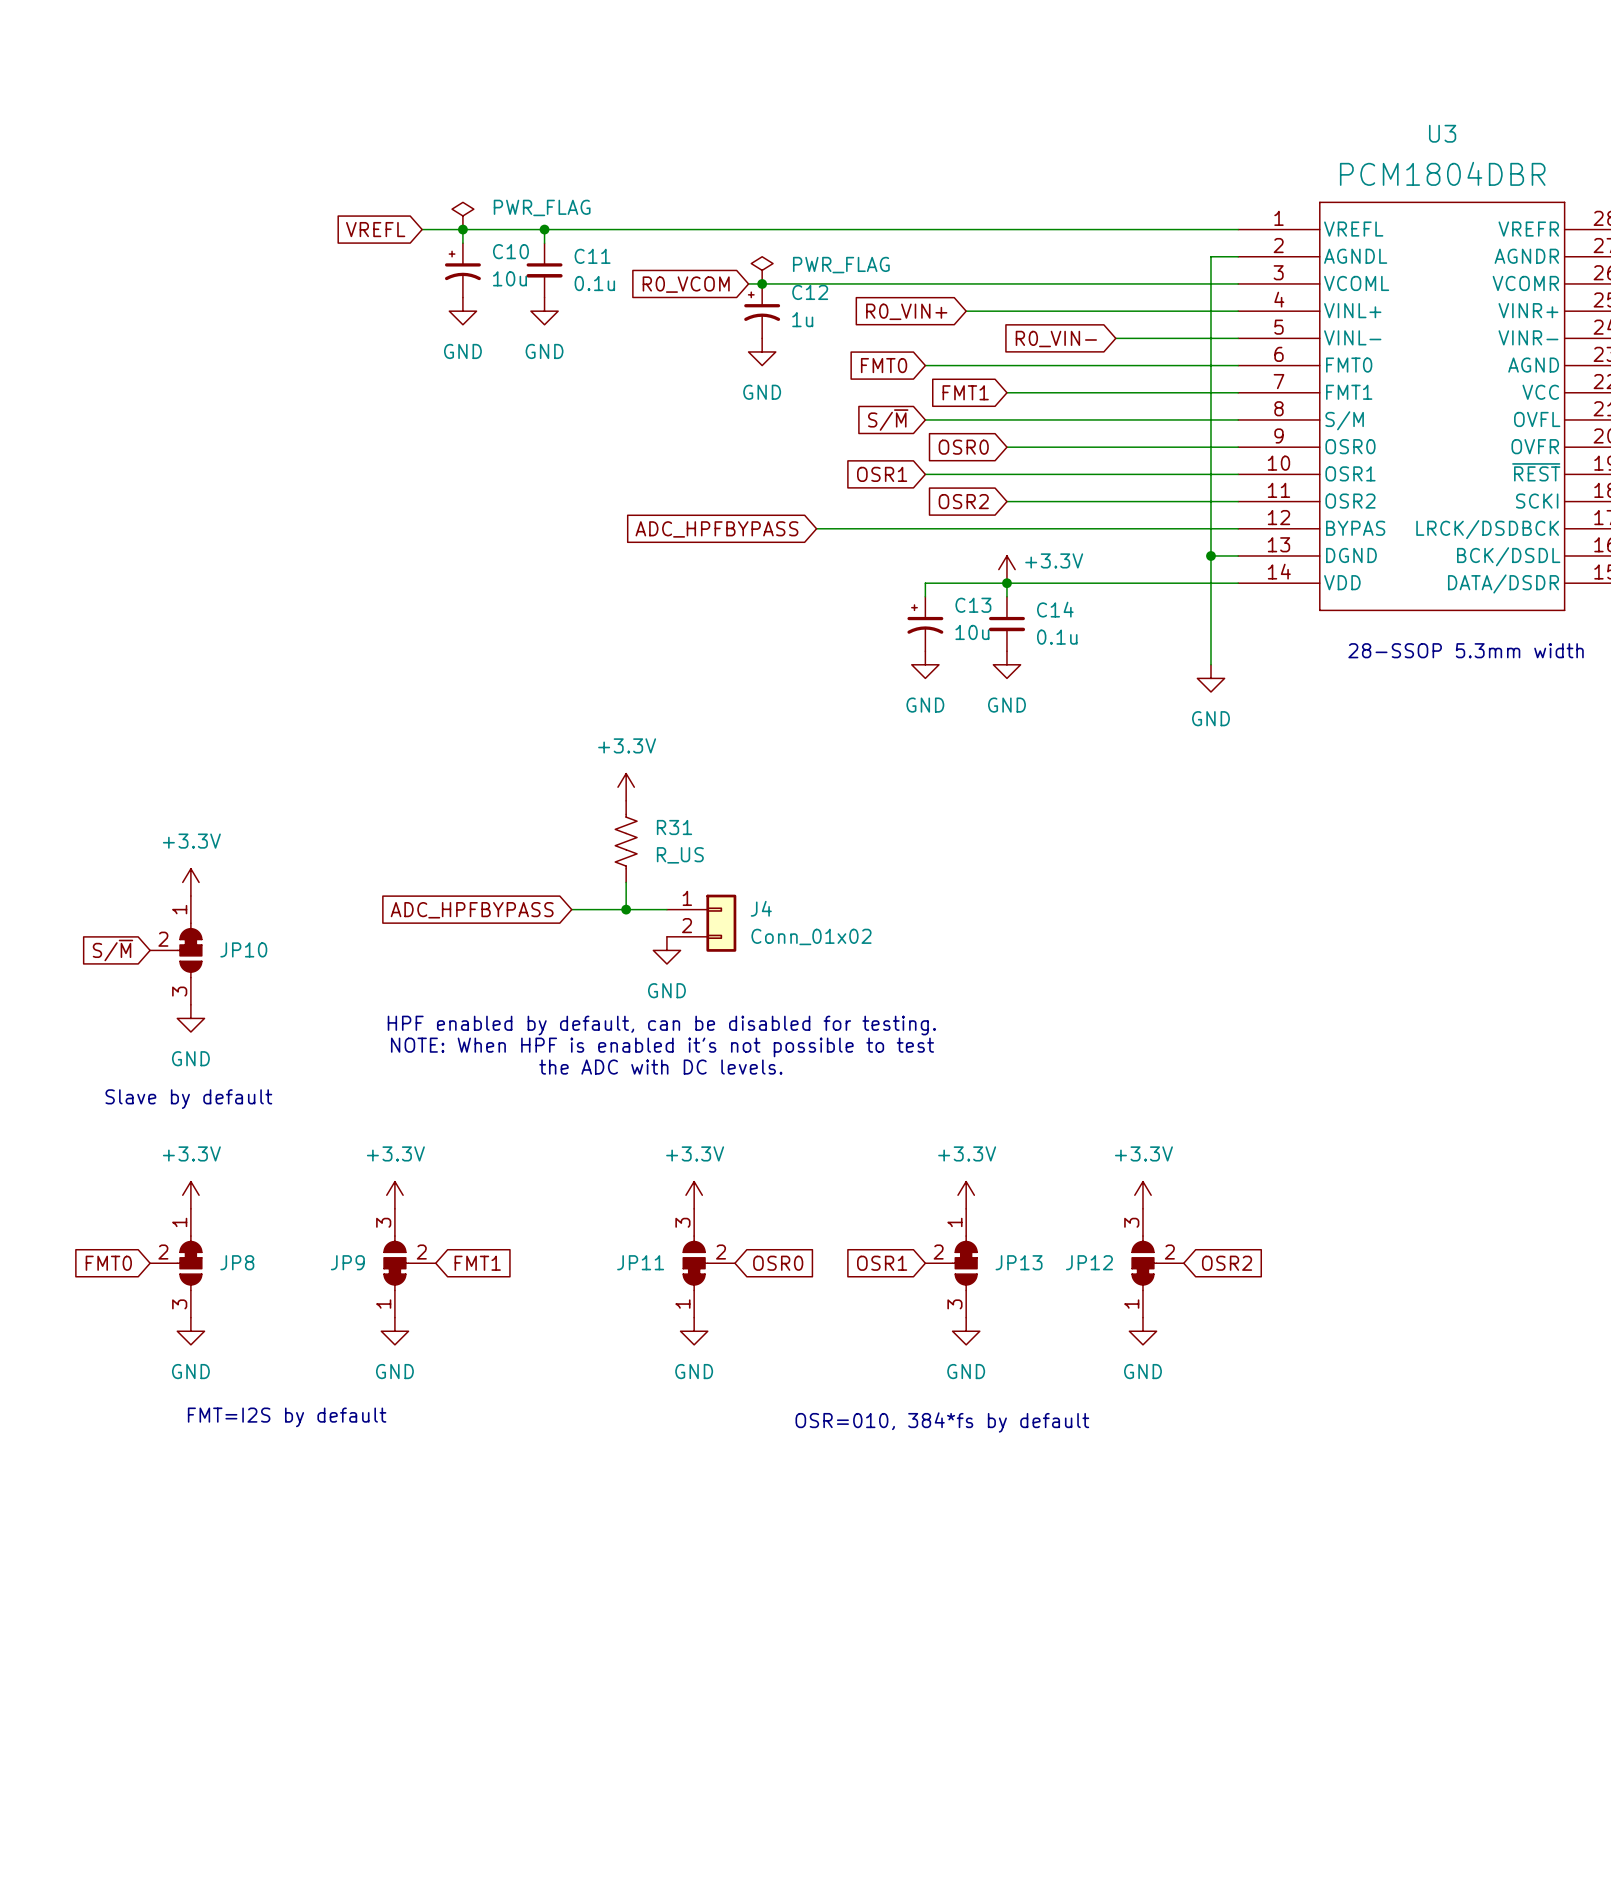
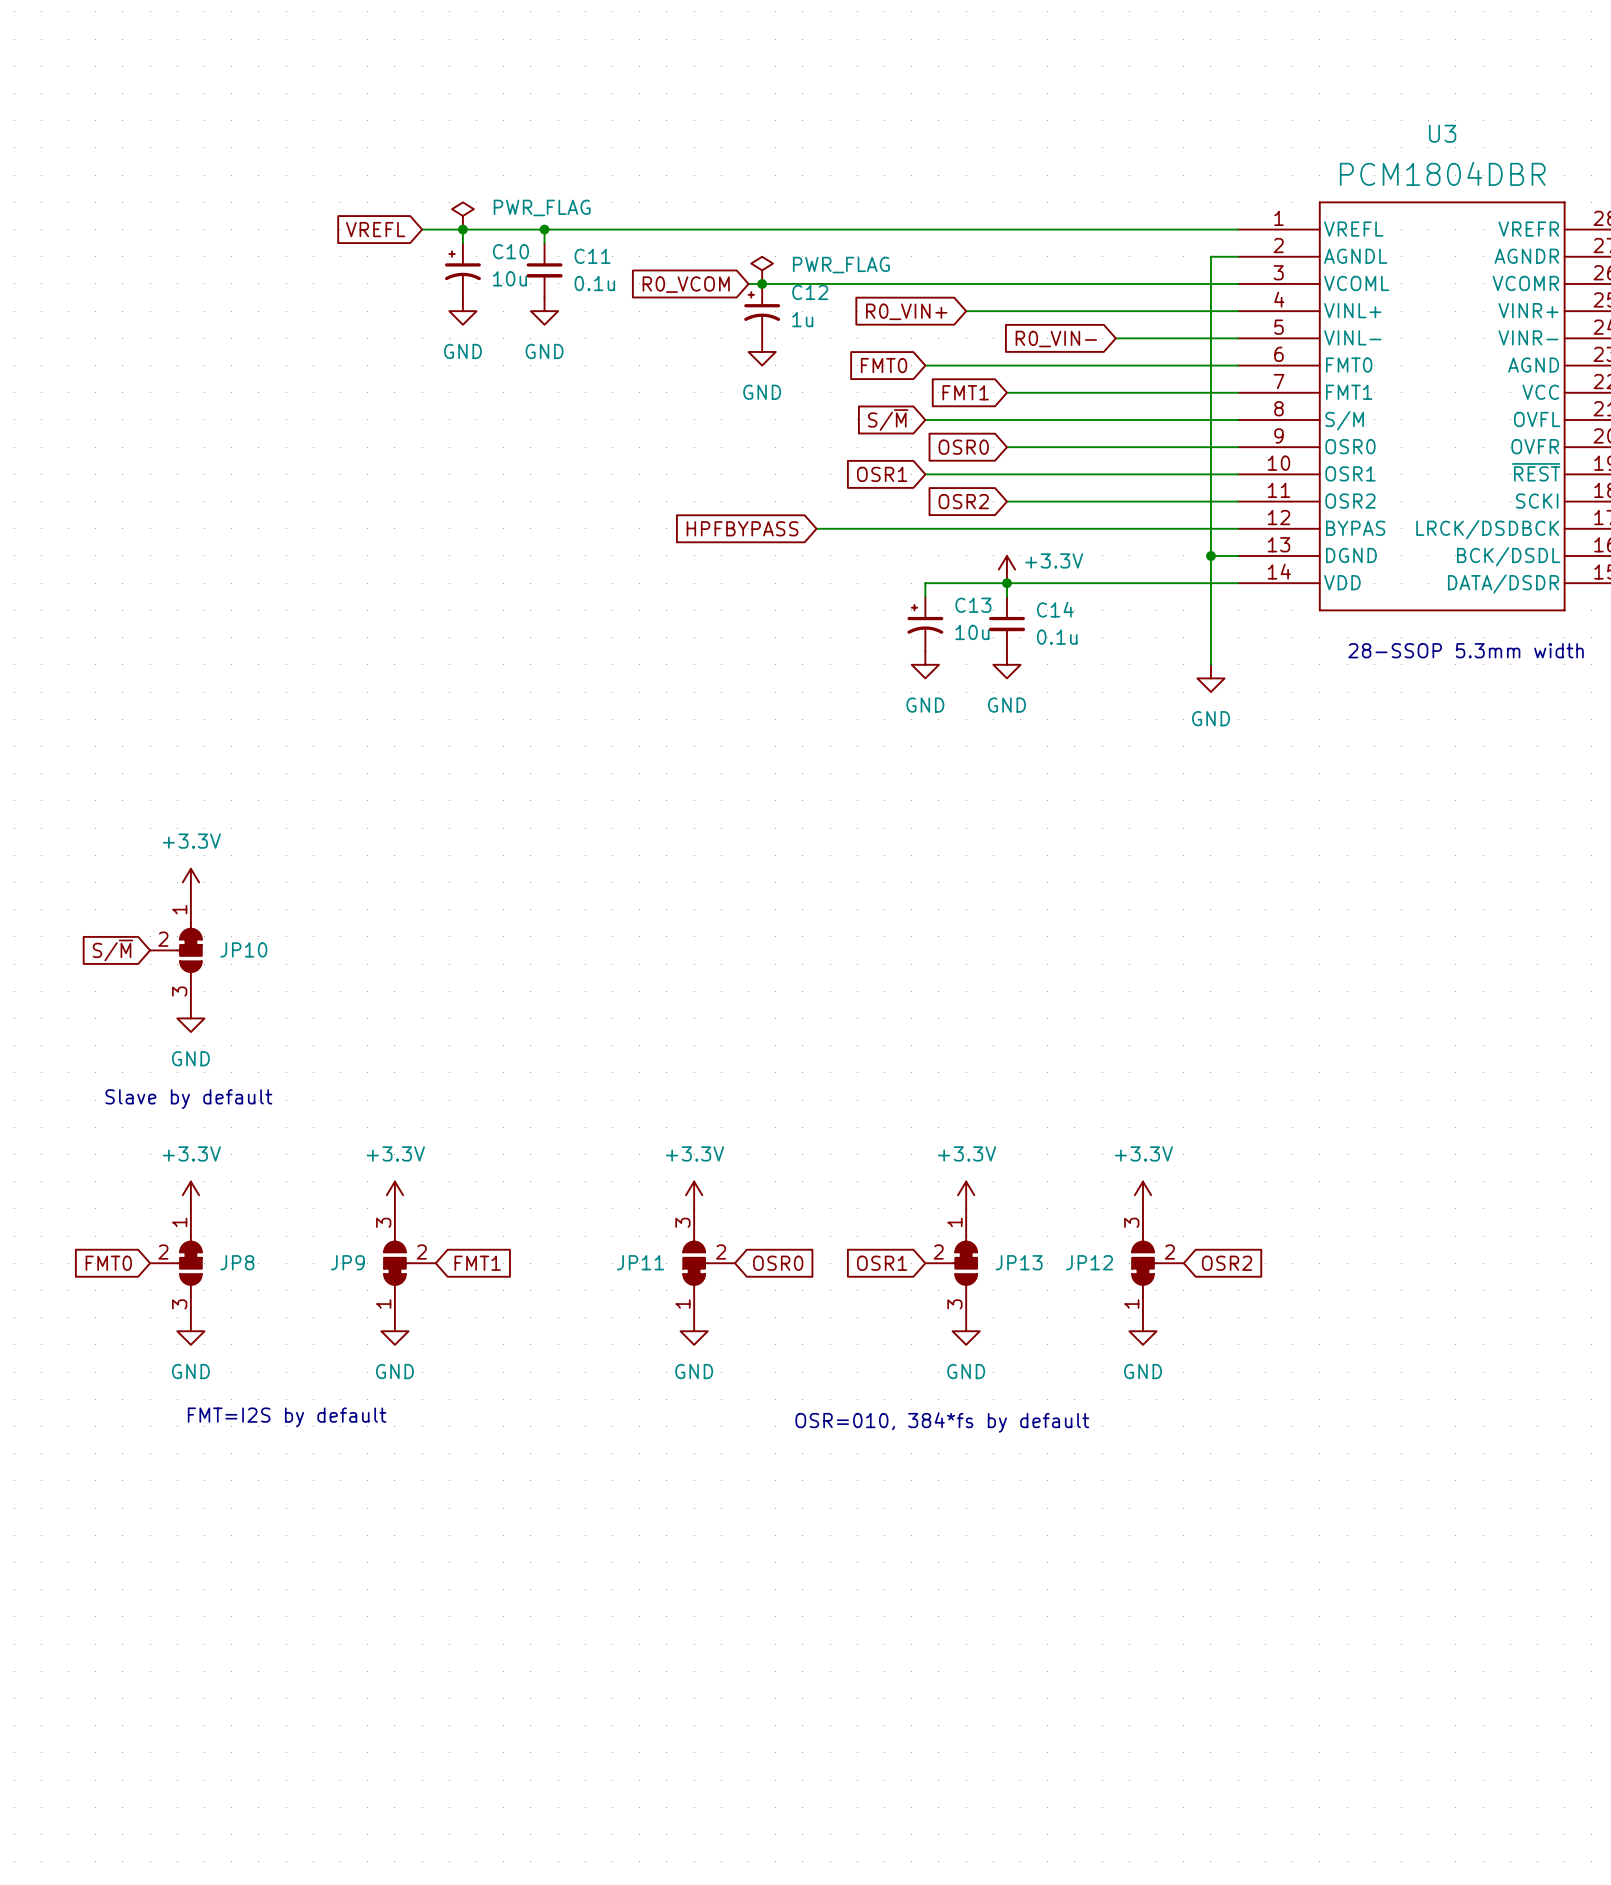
global label: ADC_HPFBYPASS (716, 529) -> HPFBYPASS (742, 528)
power symbol: +3.3V (626, 787) -> none
R31: R_US (626, 841) -> none
wire: (626, 882) (626, 909) -> none
wire: (571, 909) (666, 909) -> none
junction: (626, 909) -> none
global label: ADC_HPFBYPASS (472, 910) -> none
J4: Conn_01x02 (701, 923) -> none
power symbol: GND (666, 950) -> none
text: HPF enabled by default, can be disabled for testing. (661, 1025) -> none
text: NOTE: When HPF is enabled it's not possible to test (662, 1047) -> none
text: the ADC with DC levels. (660, 1067) -> none

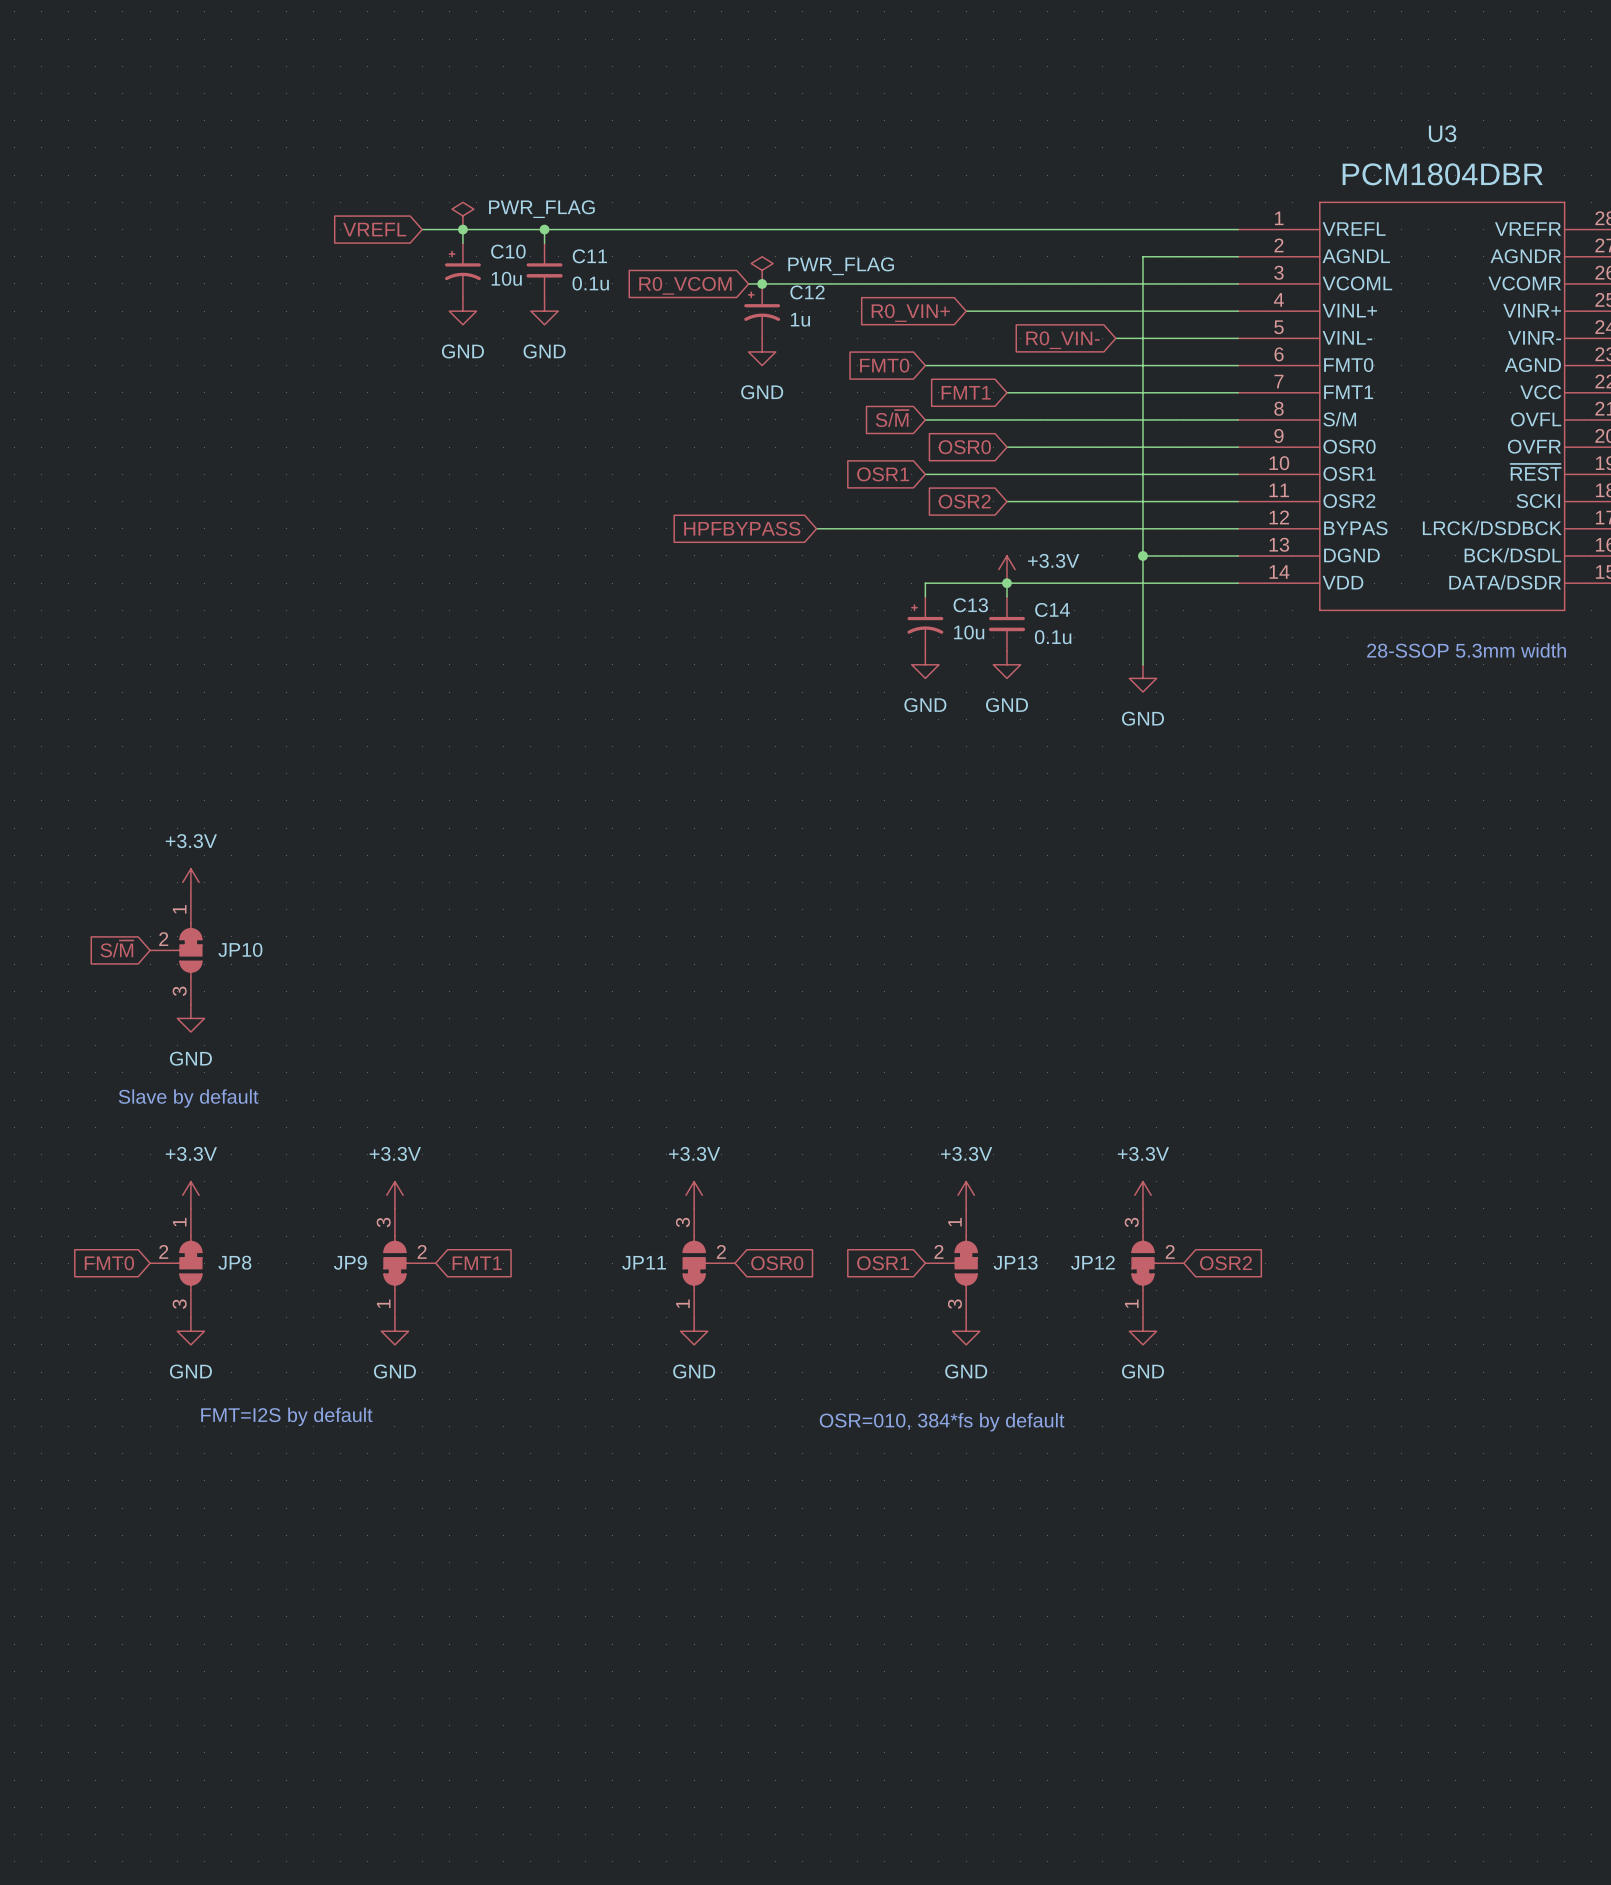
wire: (1210, 256) (1210, 664) -> (1210, 256) (1142, 256) (1142, 664)
wire: none -> (1142, 555) (1210, 555)
junction: none -> (1142, 555)
junction: (1210, 555) -> none
power symbol position: GND (1210, 678) -> GND (1142, 678)

